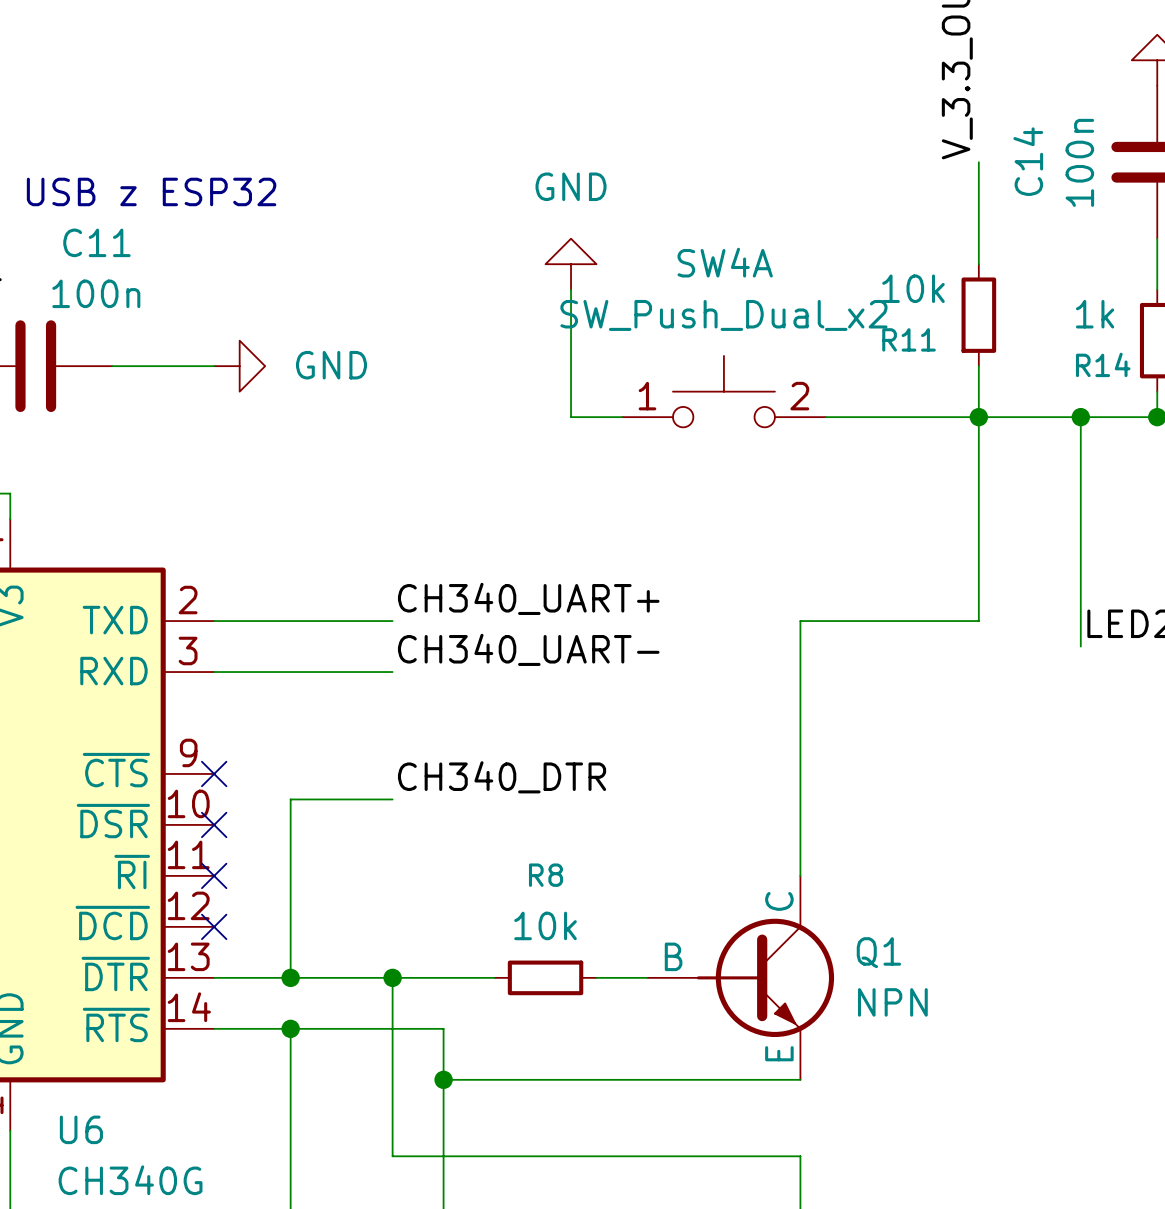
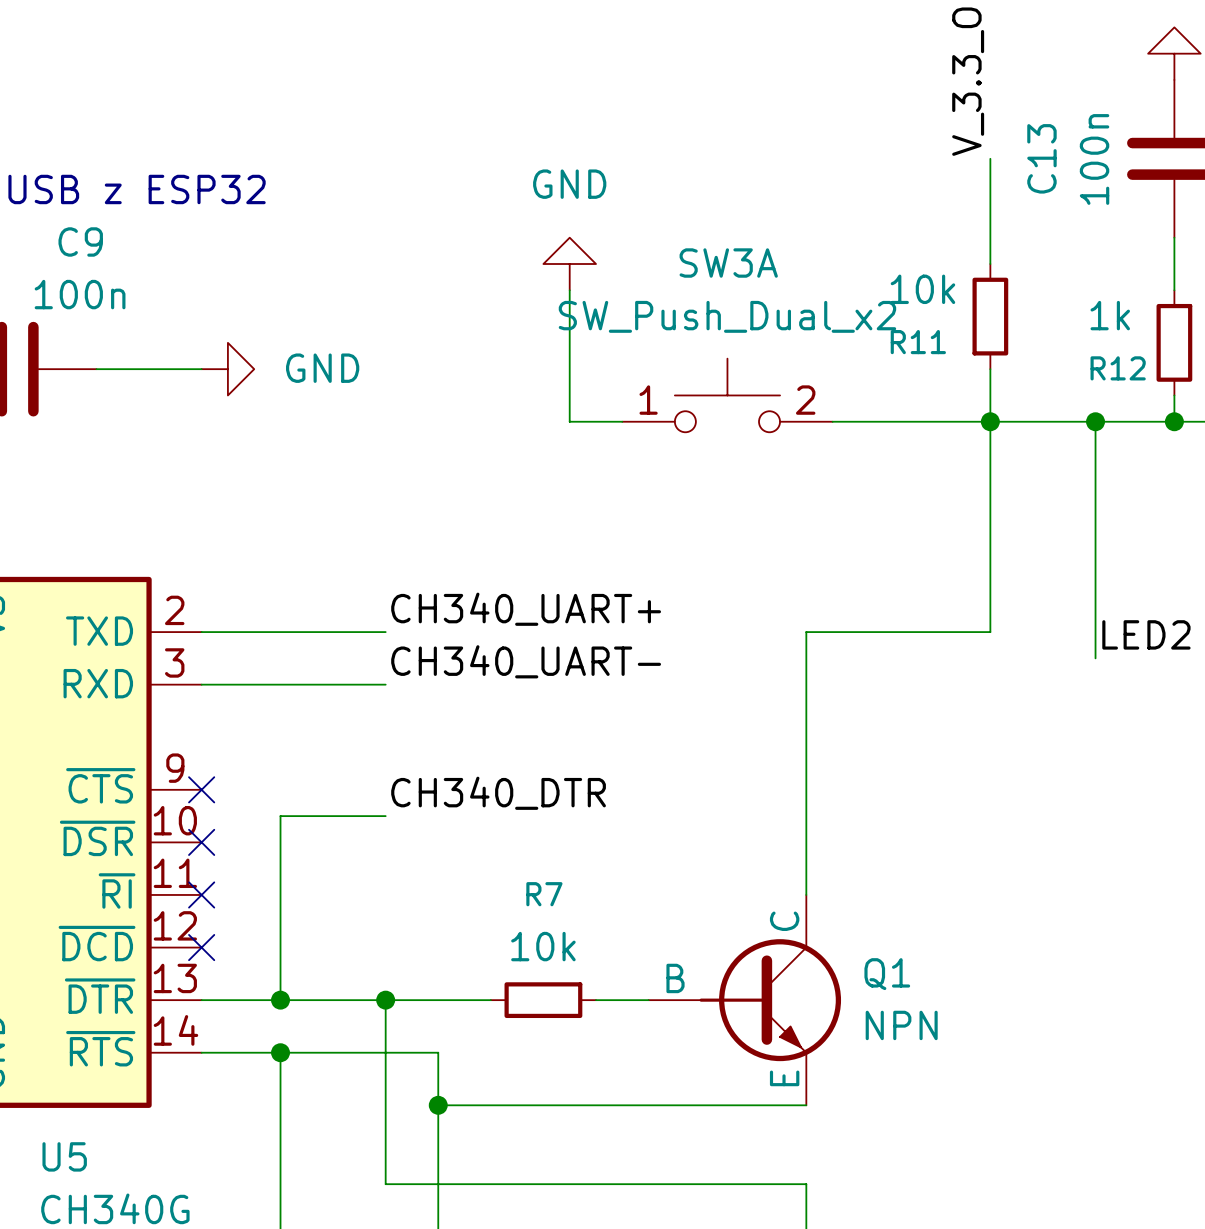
C14 name: C14 (1028, 161) -> C13 (1041, 158)
C11 name: C11 (96, 242) -> C9 (80, 241)
SW4A name: SW4A (725, 262) -> SW3A (728, 263)
R14 name: R14 (1103, 364) -> R12 (1118, 368)
R8 name: R8 (546, 875) -> R7 (544, 894)
U6 name: U6 (81, 1129) -> U5 (64, 1156)

